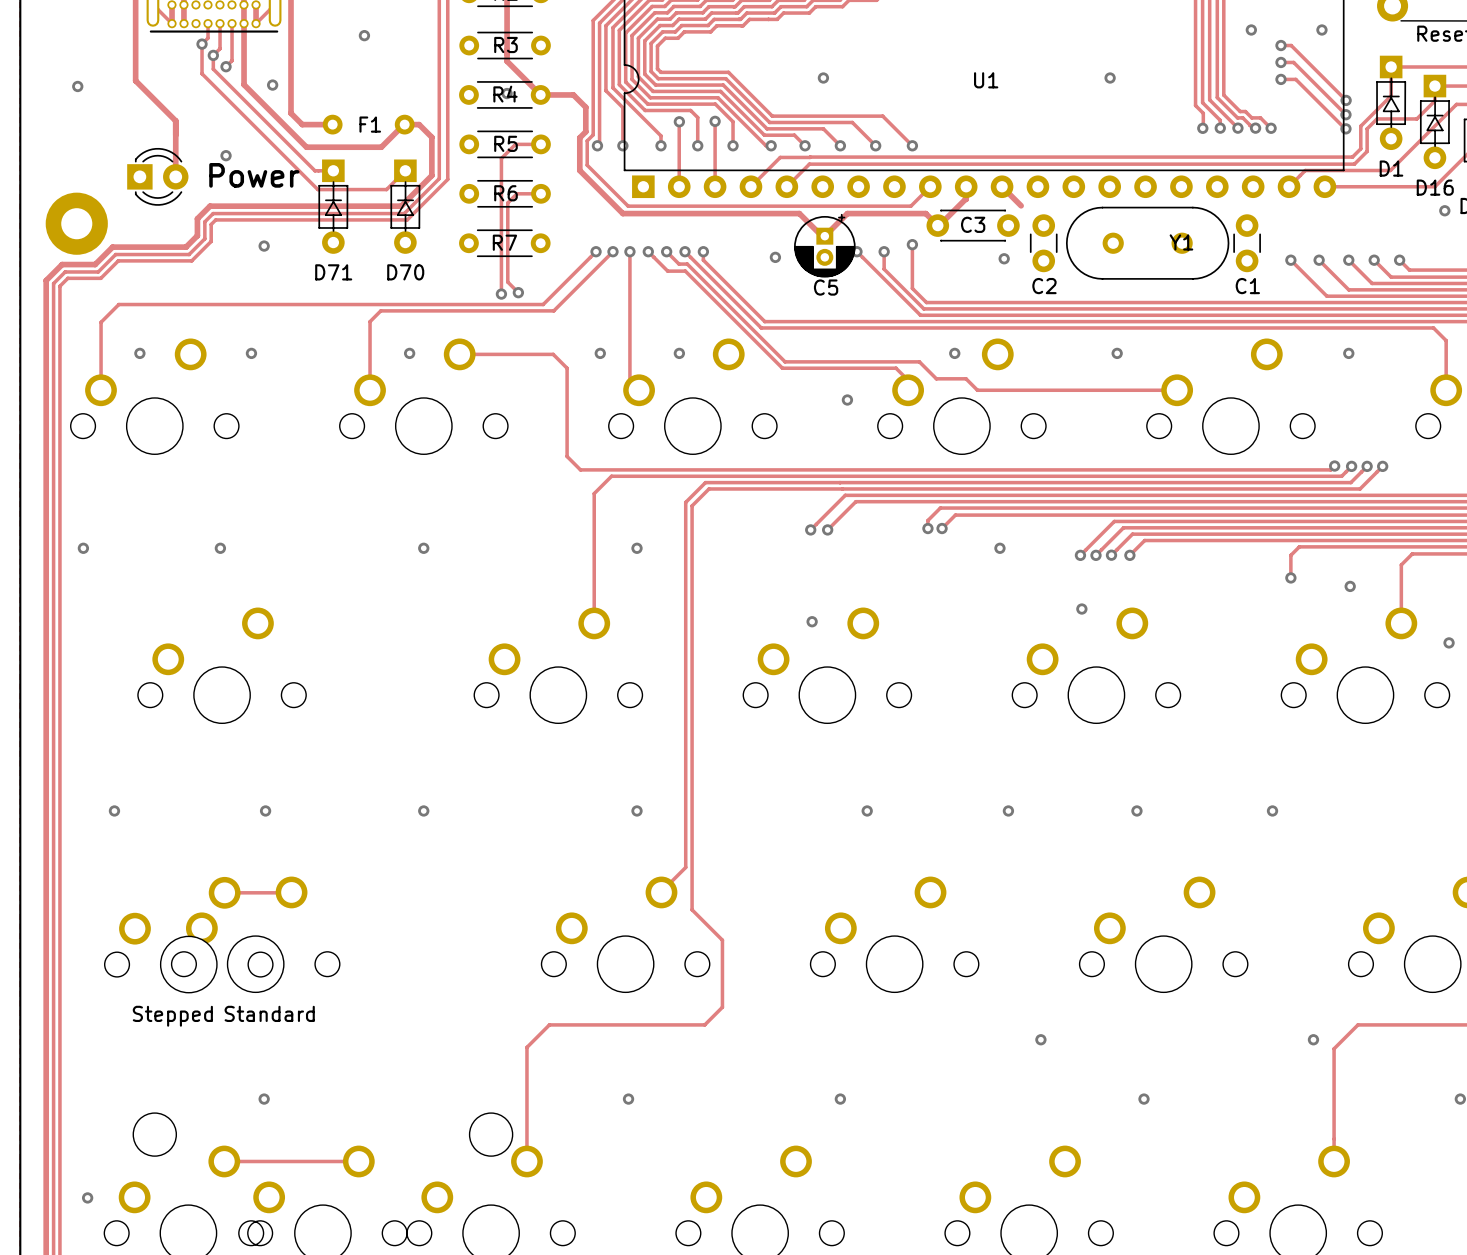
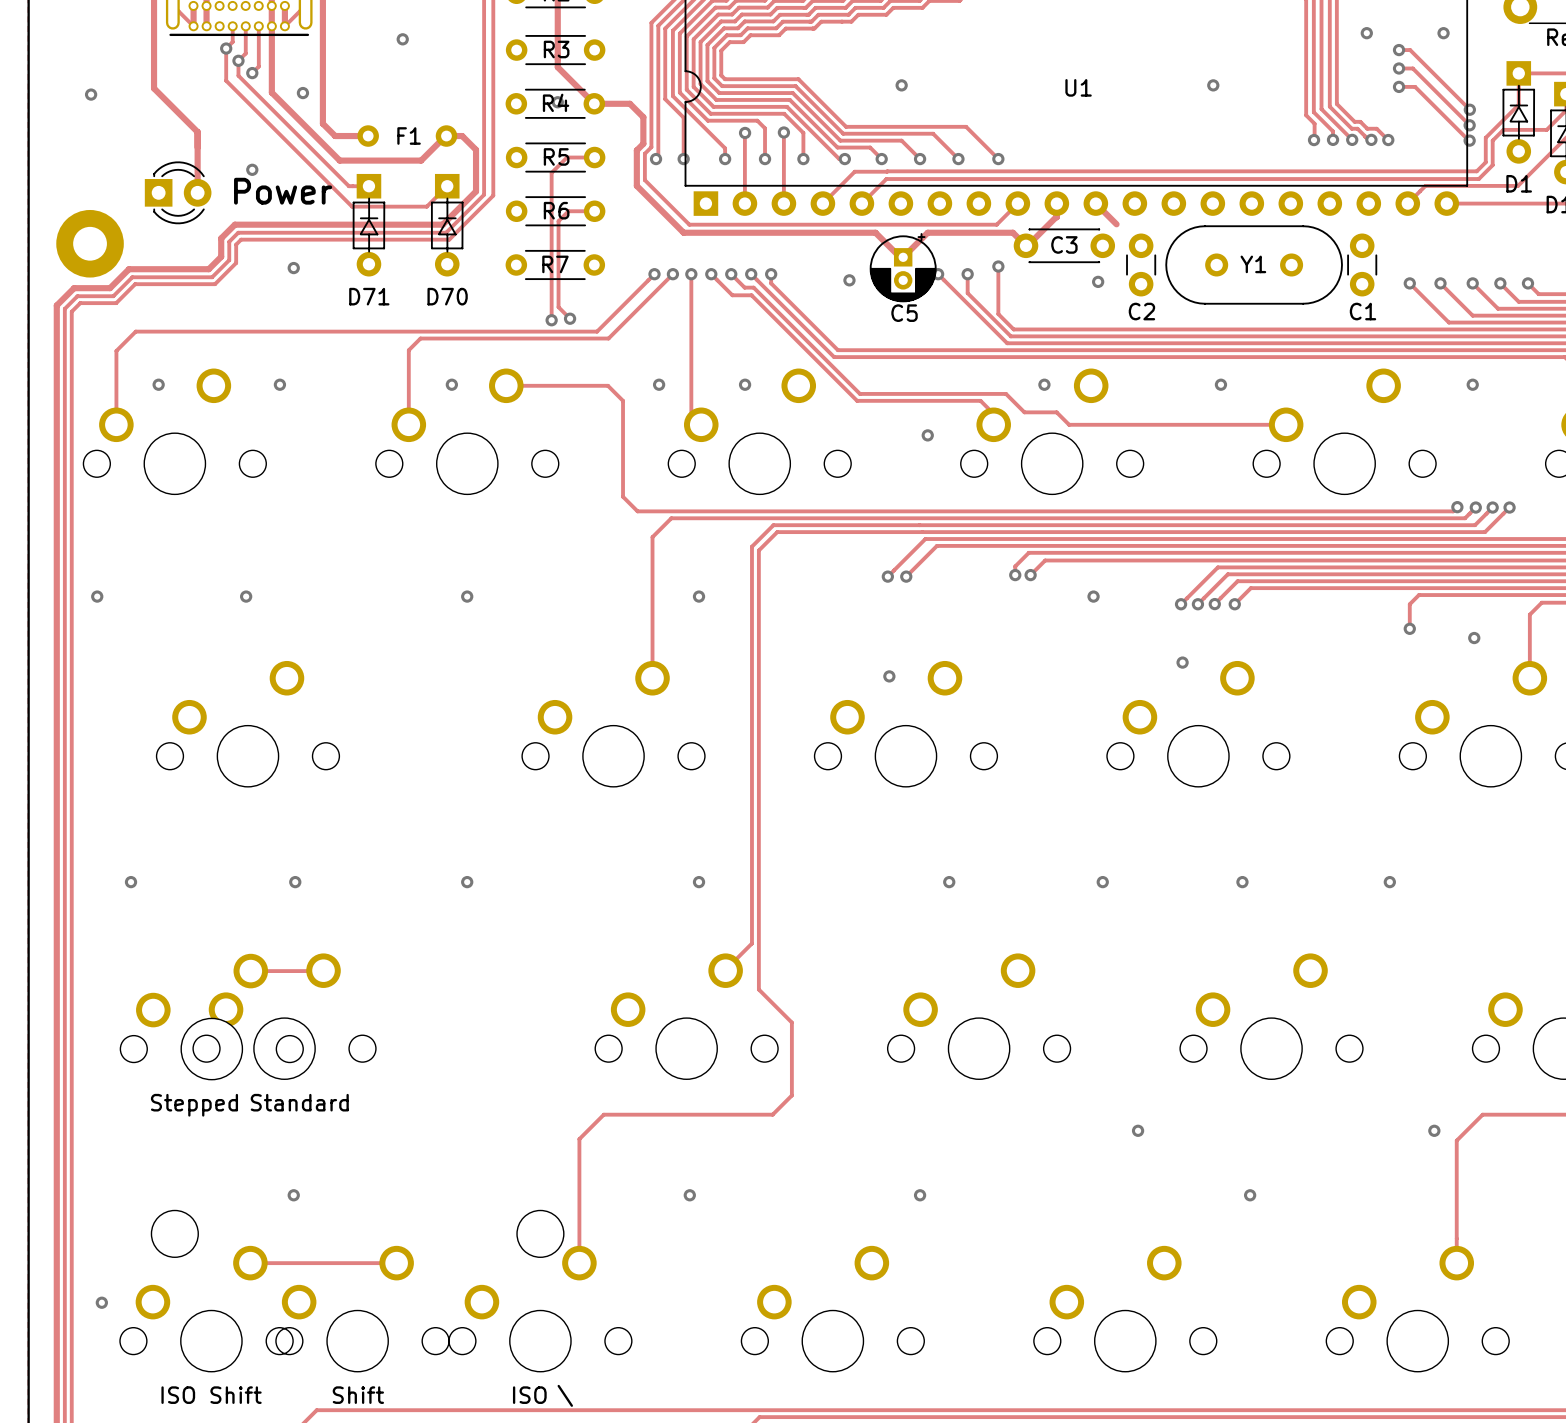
Y1 name position: Y1 (1181, 242) -> Y1 (1253, 264)

